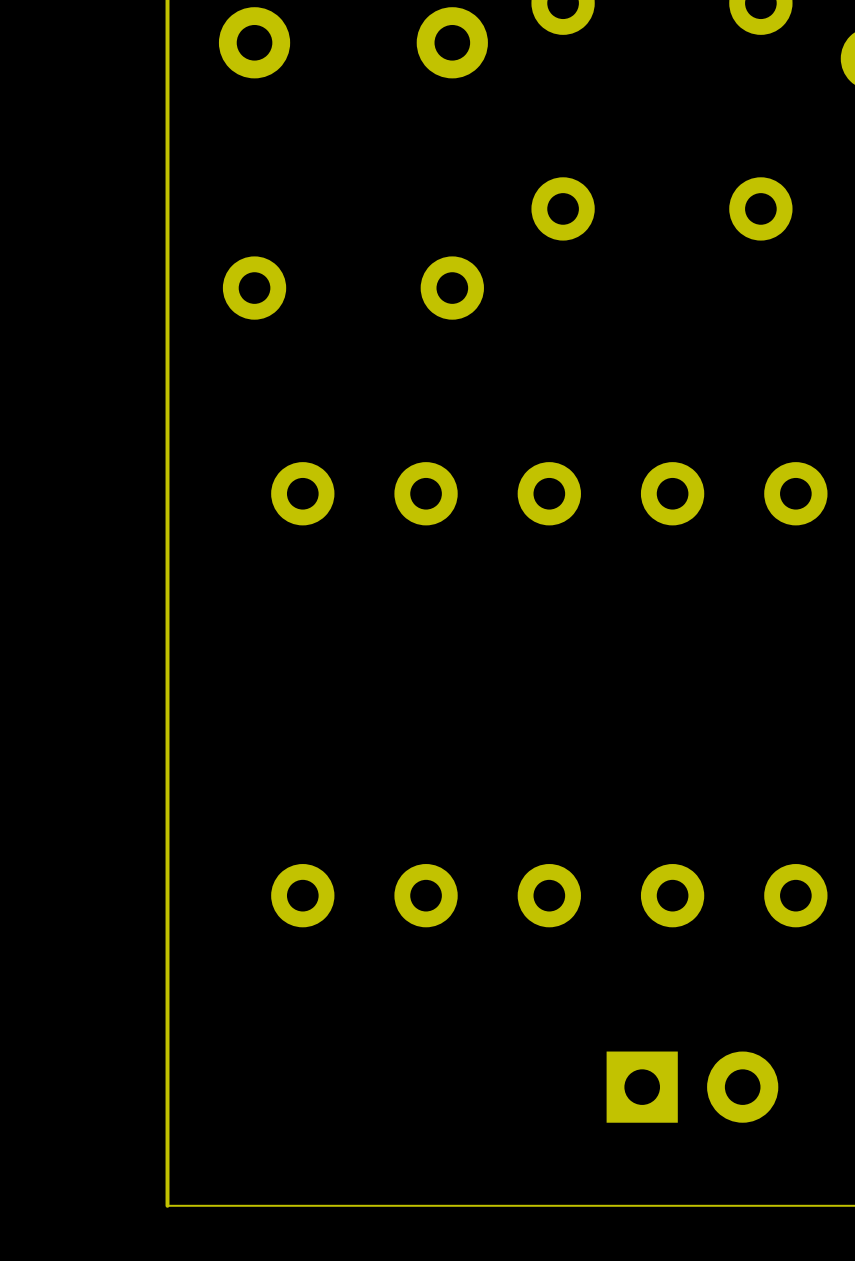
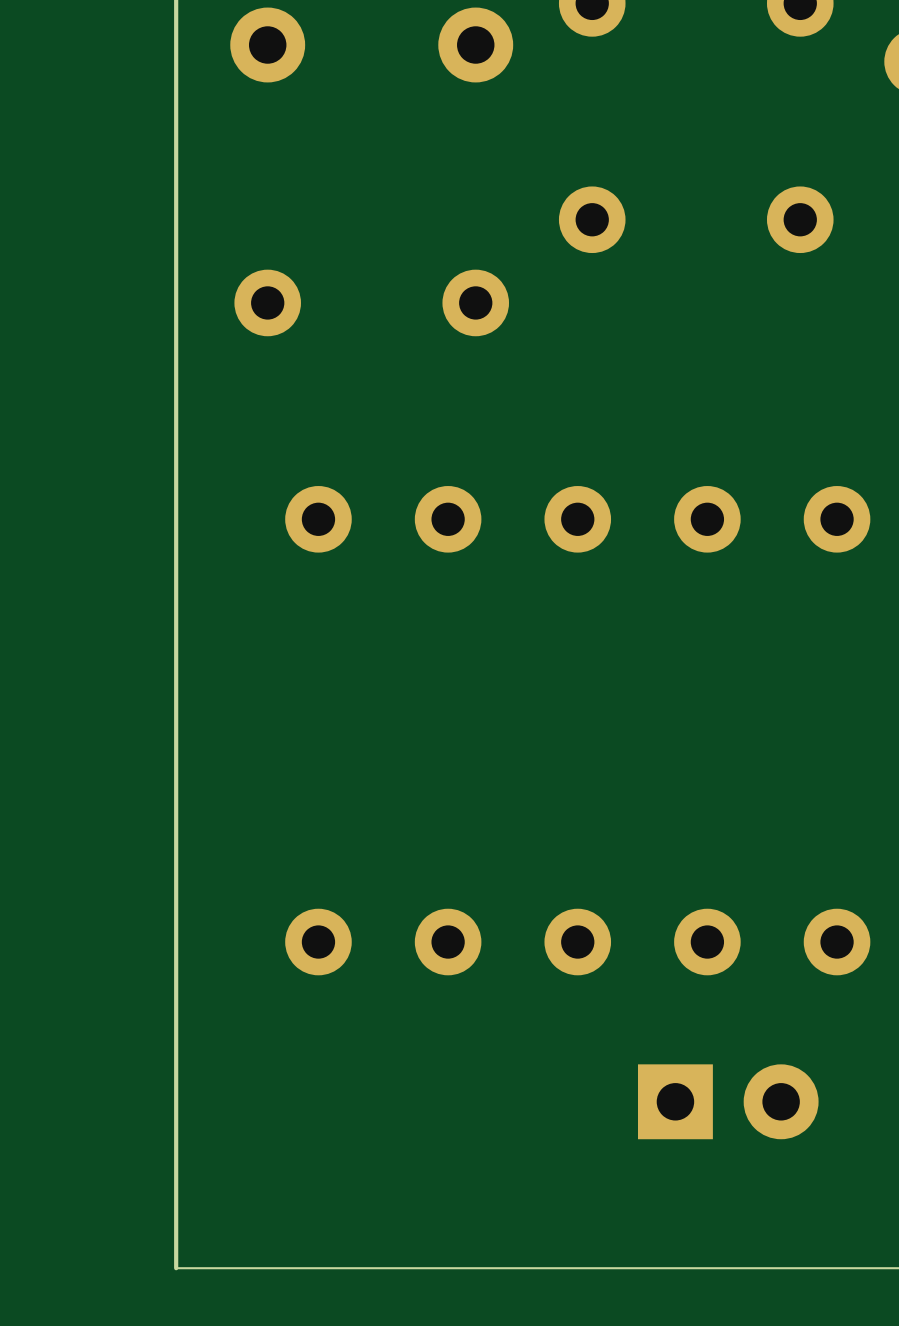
part position: (692, 1087) -> (728, 1101)

